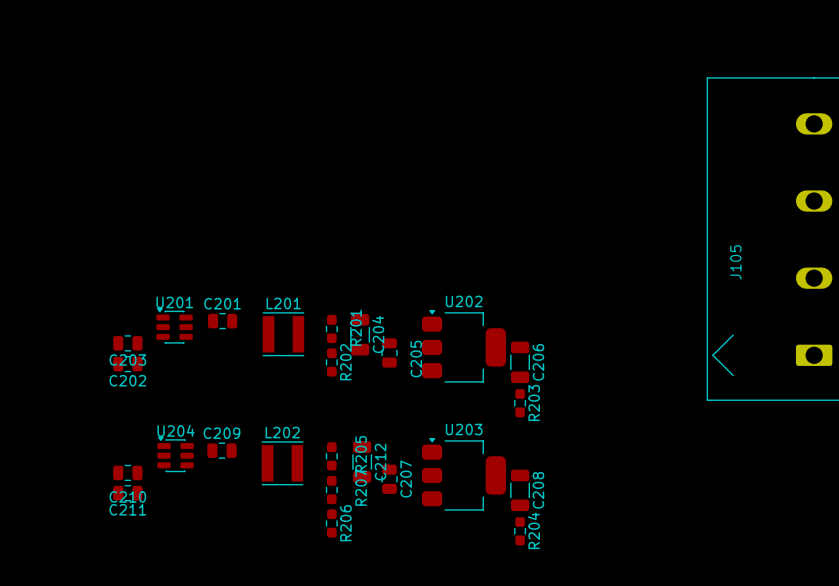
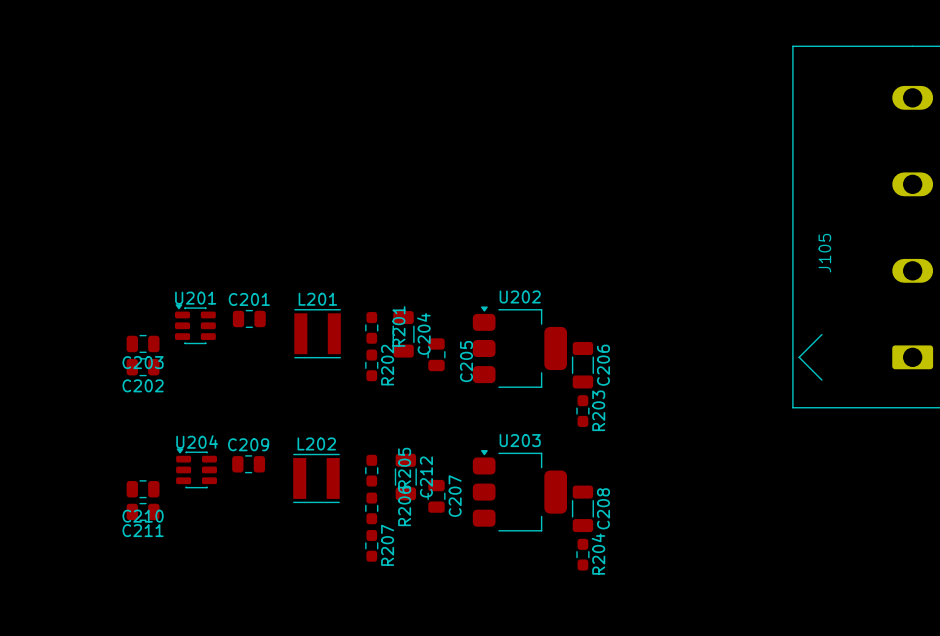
R207 name: R207 (361, 487) -> R206 (404, 505)
R206 name: R206 (345, 523) -> R207 (387, 545)

